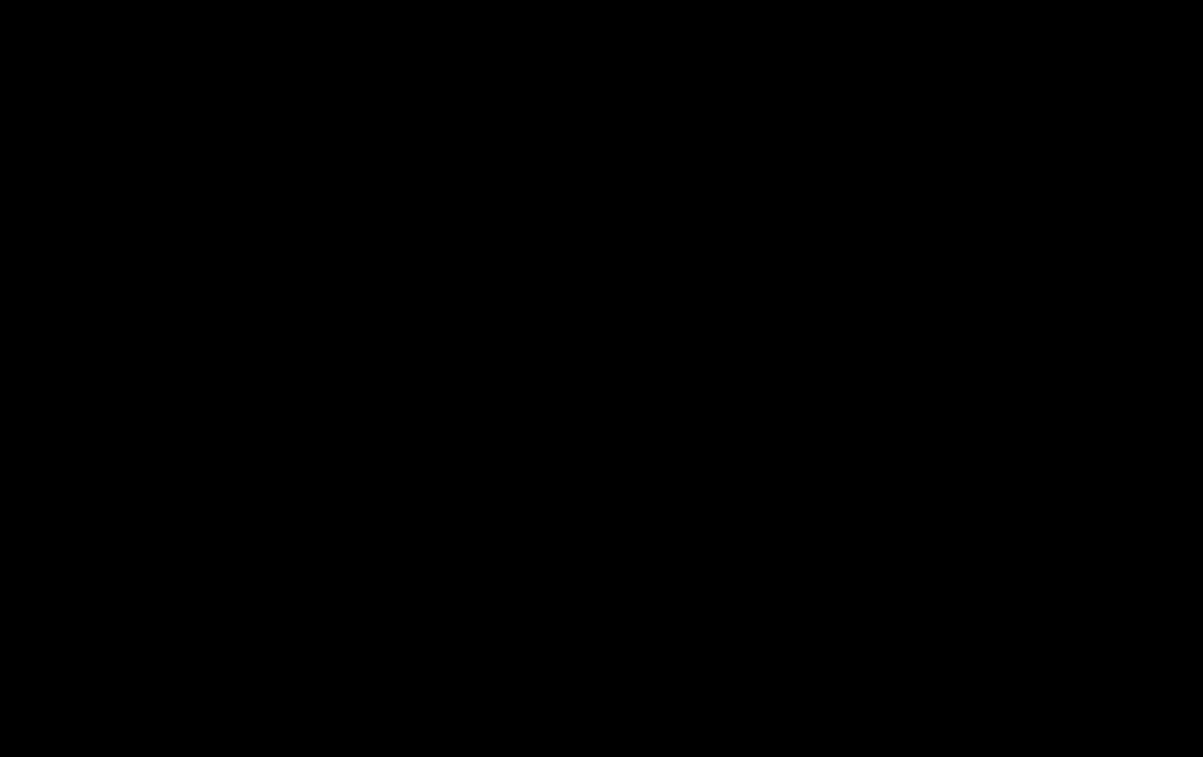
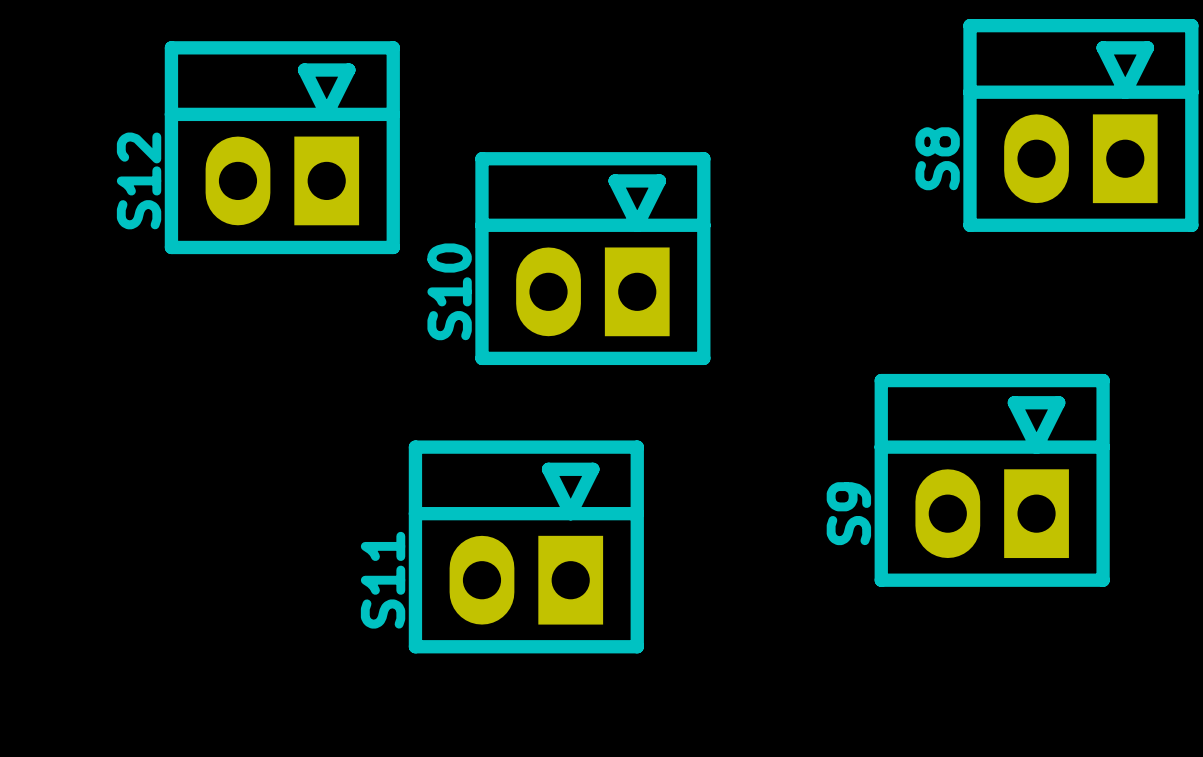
S8: none -> (1080, 125)
S12: none -> (282, 147)
S10: none -> (592, 258)
S9: none -> (992, 480)
S11: none -> (526, 546)

